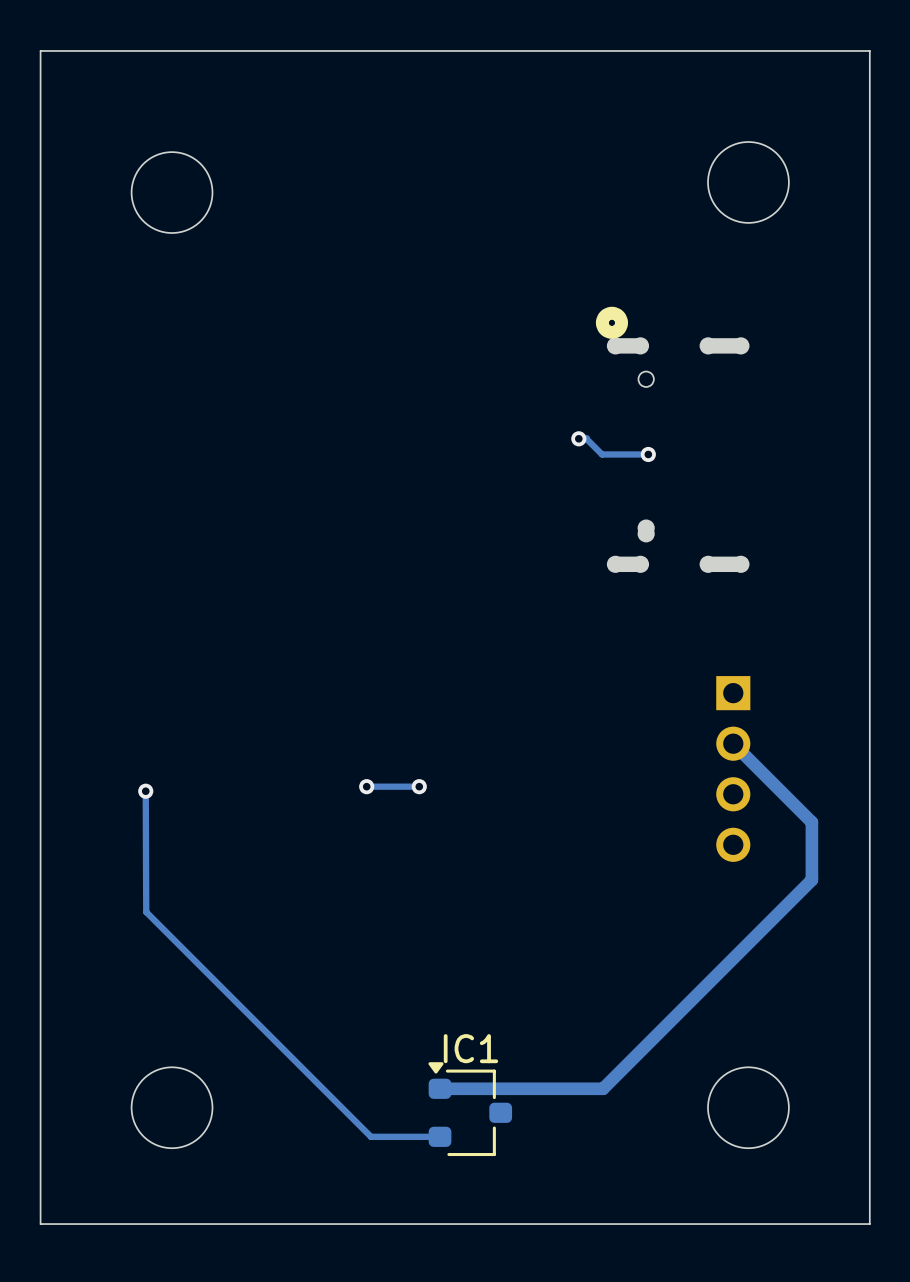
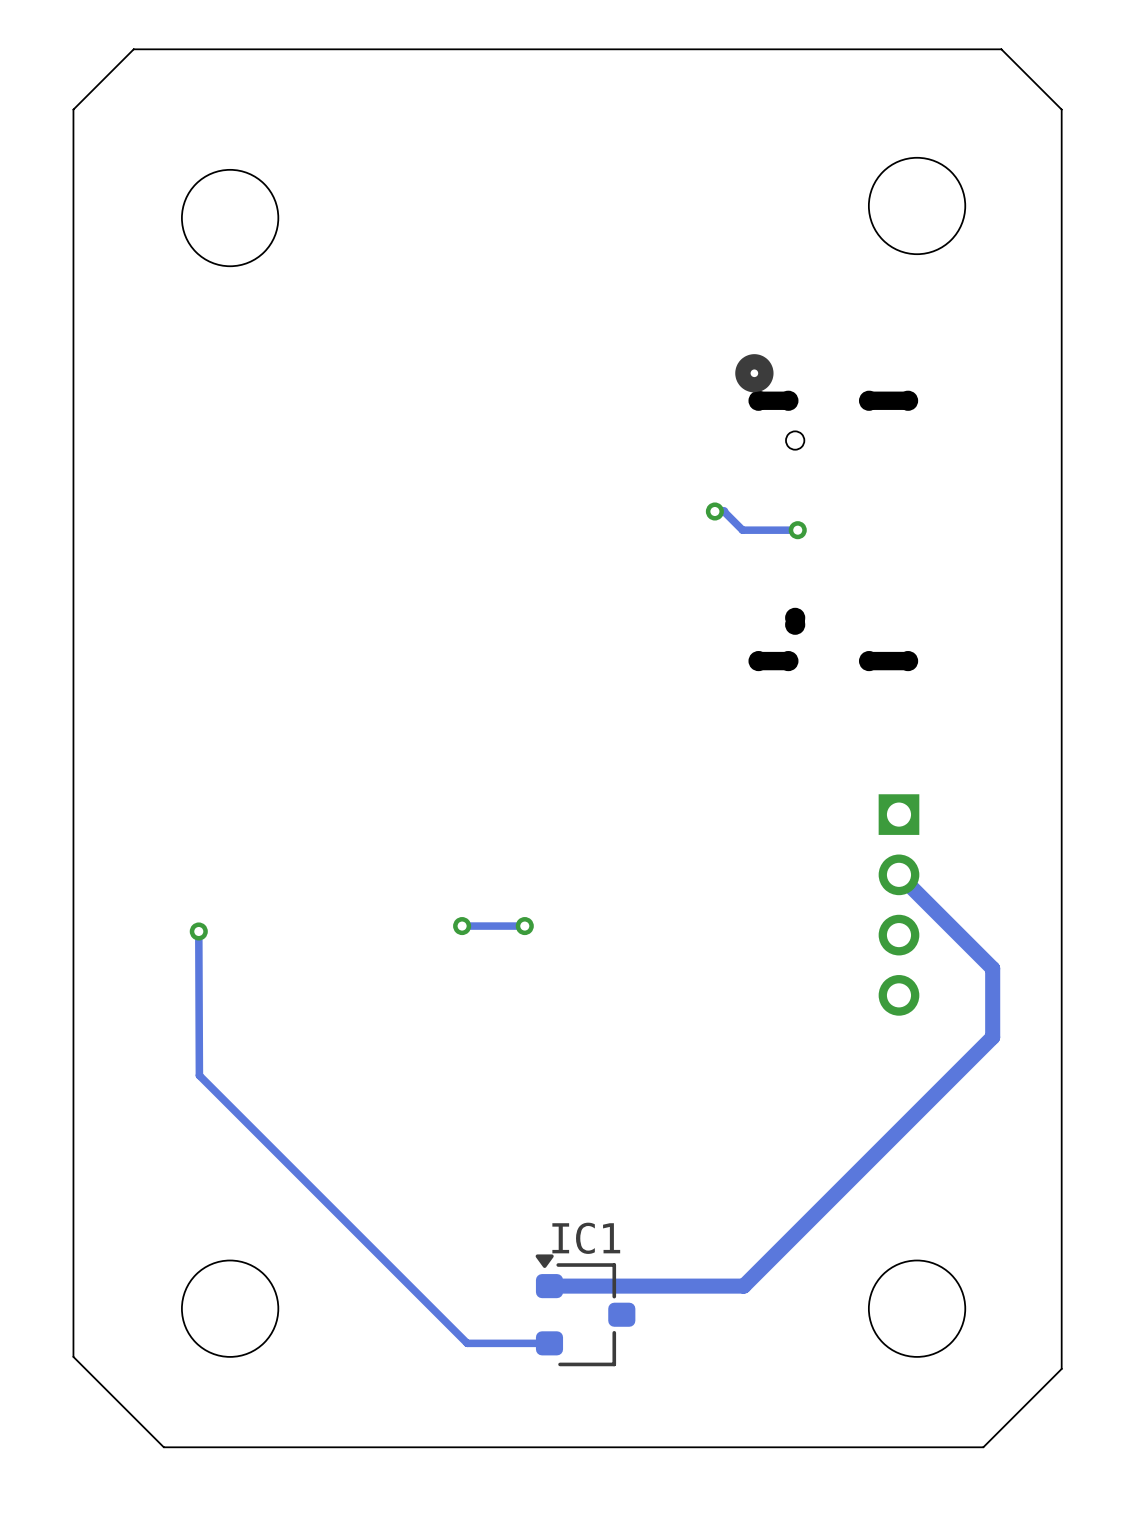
board edge: (91, 50) (40, 50) (40, 101) -> (133, 49) (73, 109)
board edge: (819, 50) (869, 50) (869, 101) -> (1001, 49) (1061, 109)
board edge: (40, 1148) (40, 1224) (116, 1224) -> (73, 1356) (163, 1447)
board edge: (869, 1158) (869, 1224) (804, 1224) -> (1061, 1368) (983, 1447)

